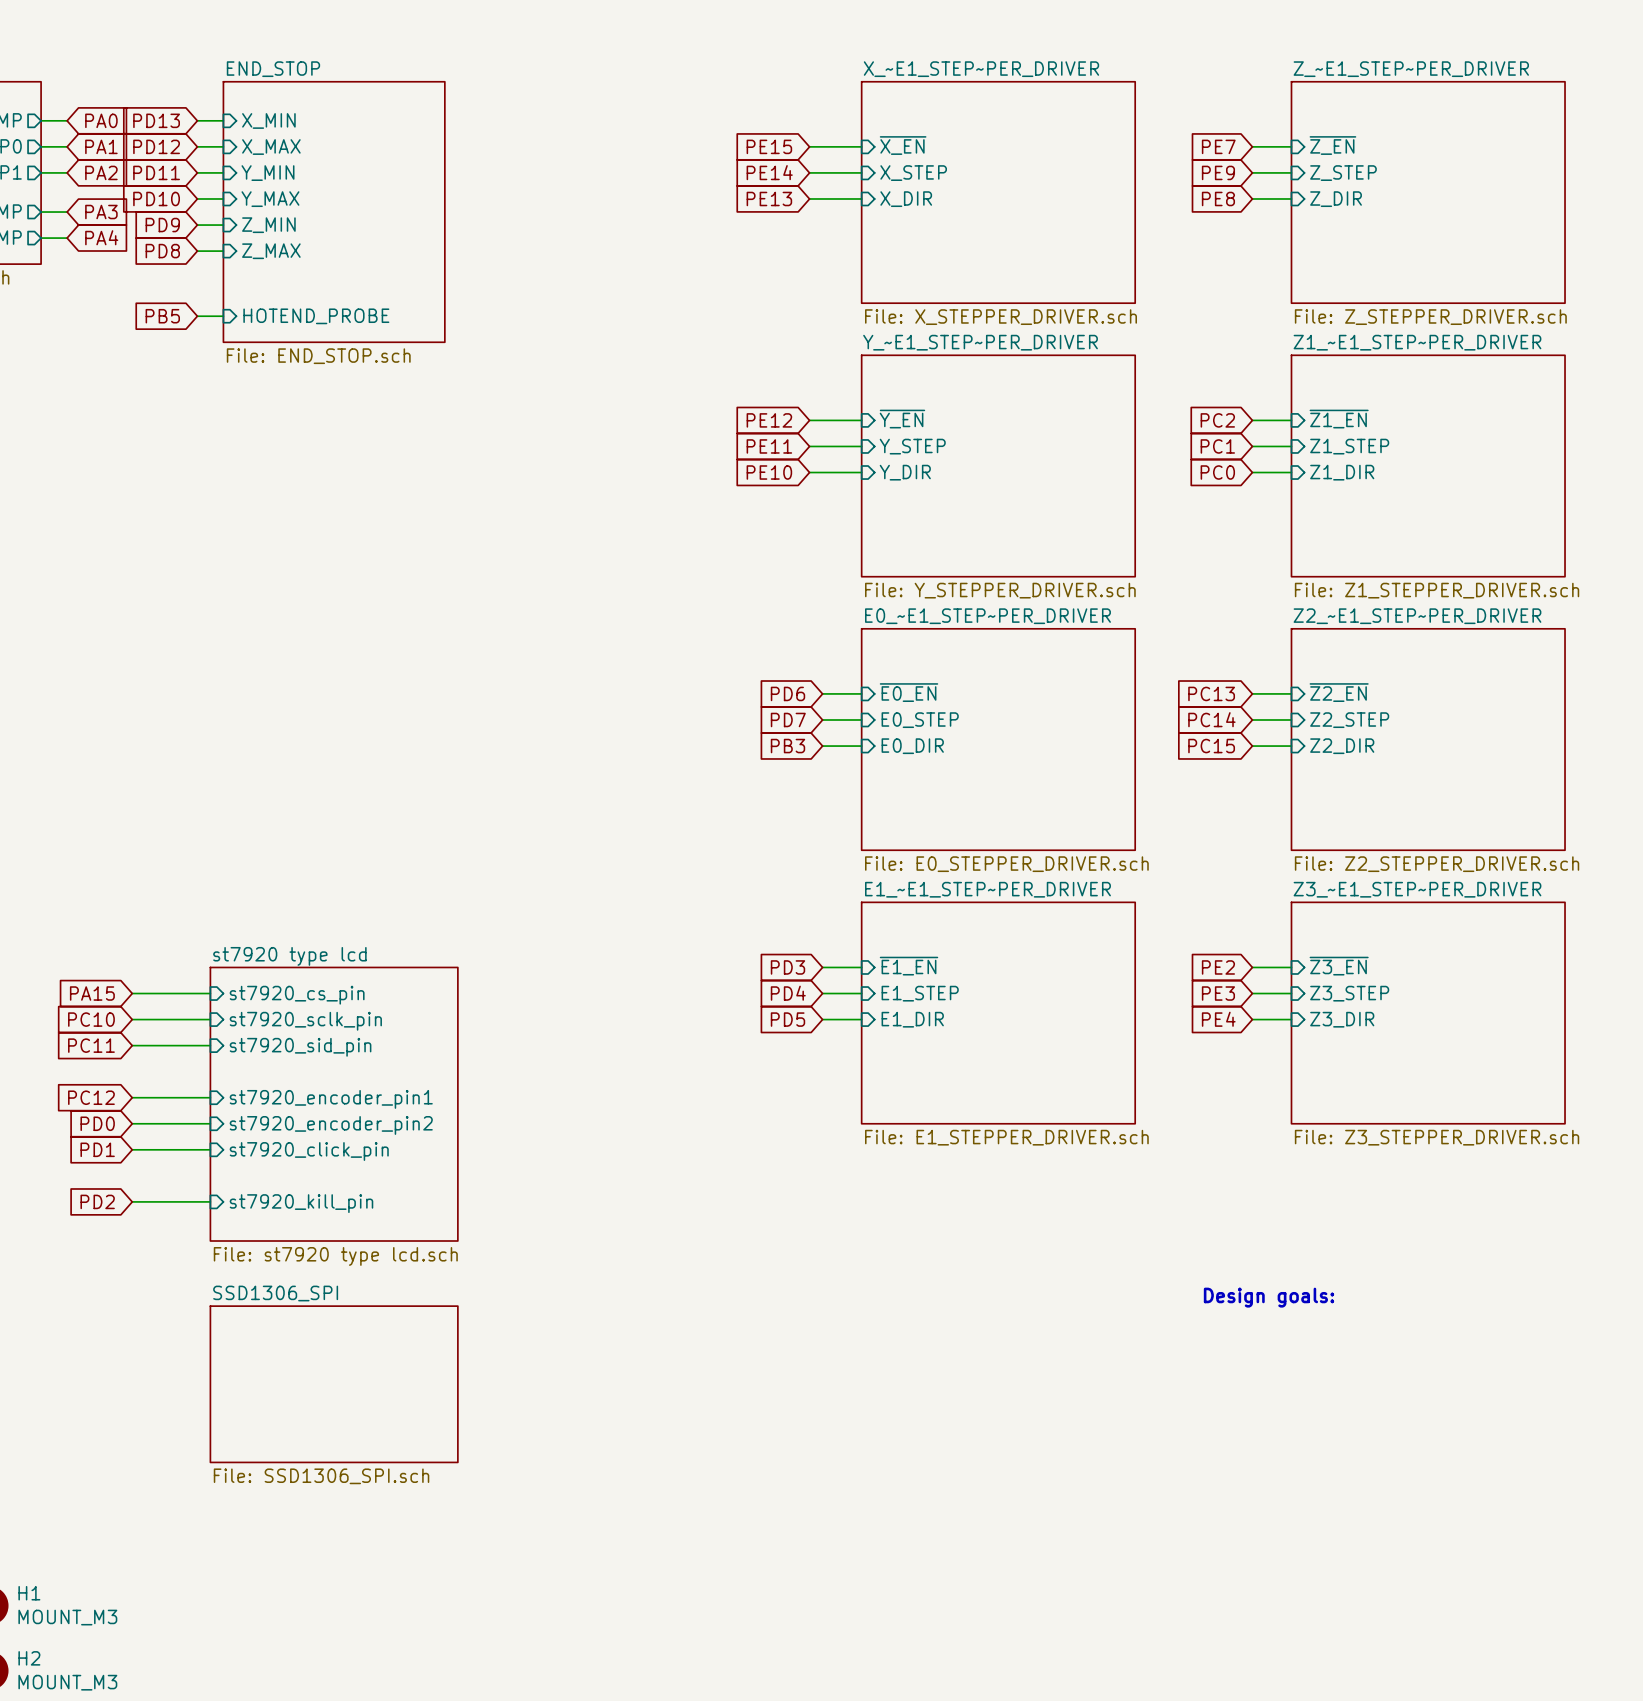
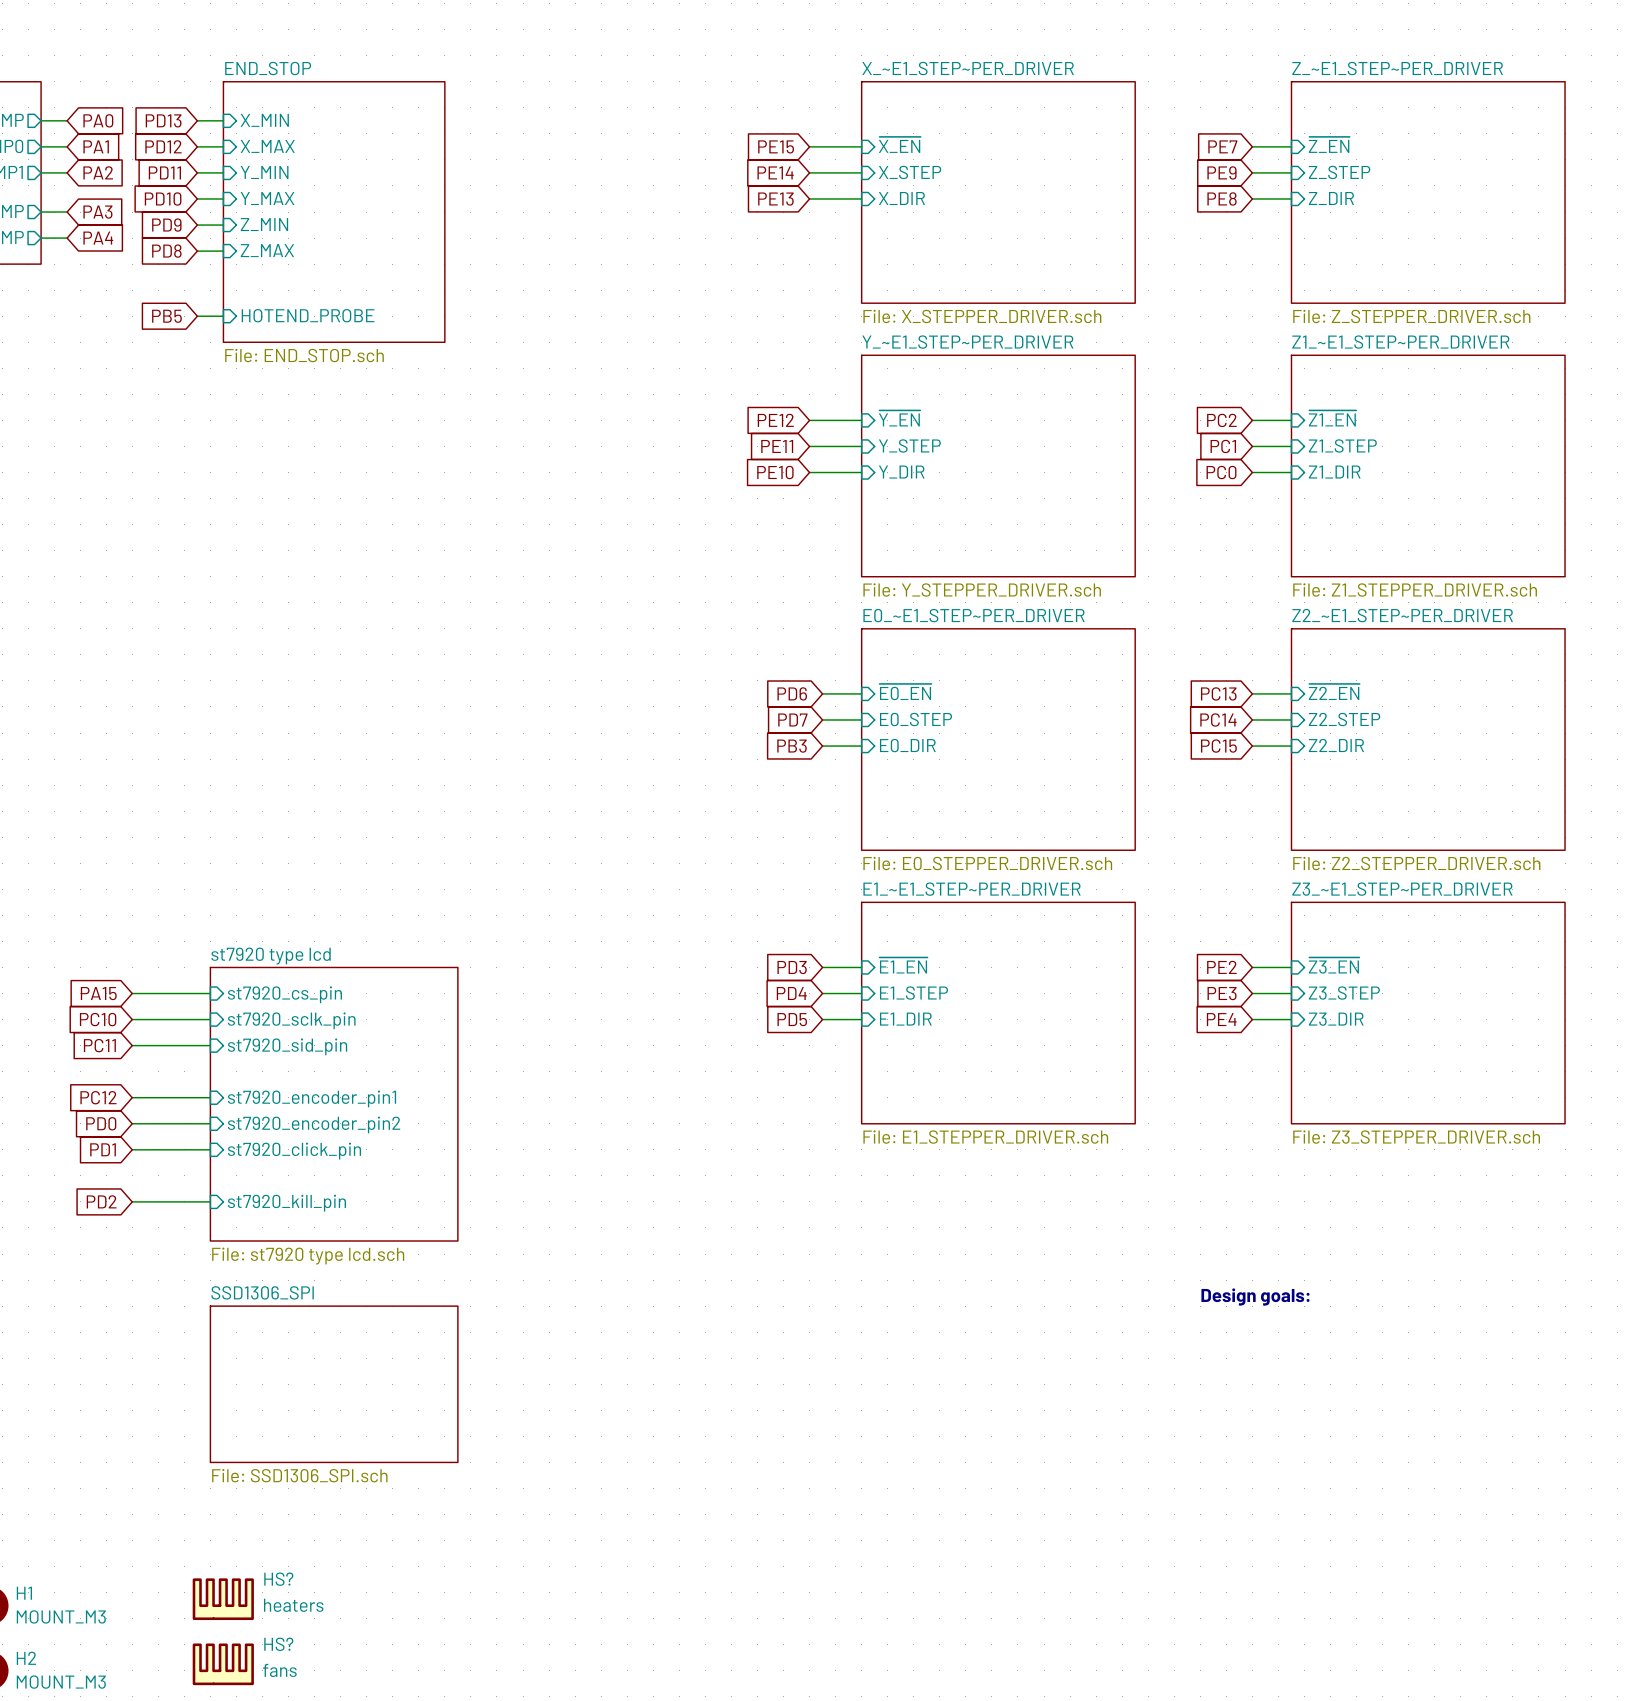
HS?: none -> heaters (223, 1599)
HS?: none -> fans (223, 1664)

